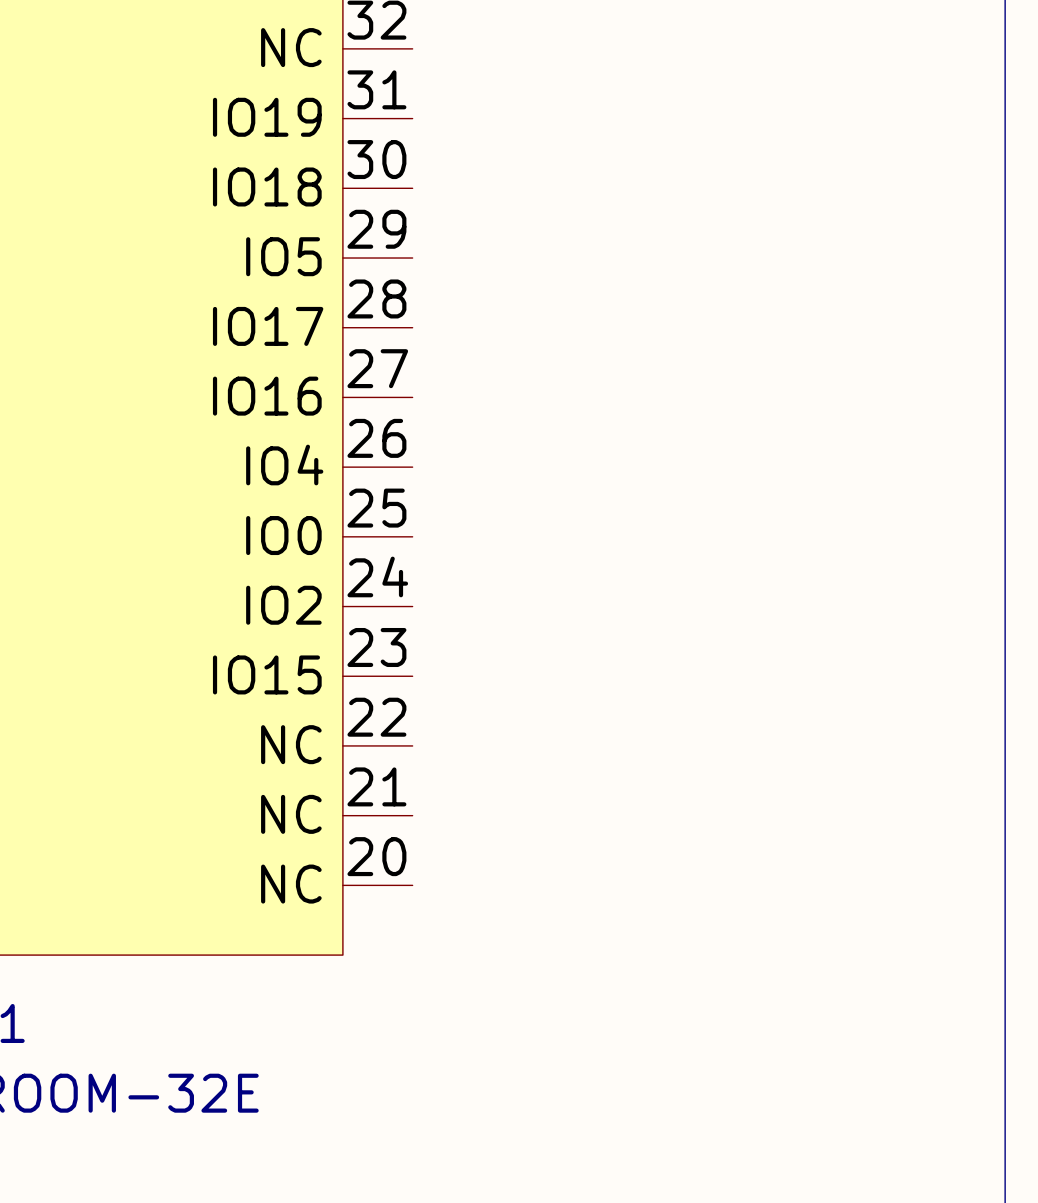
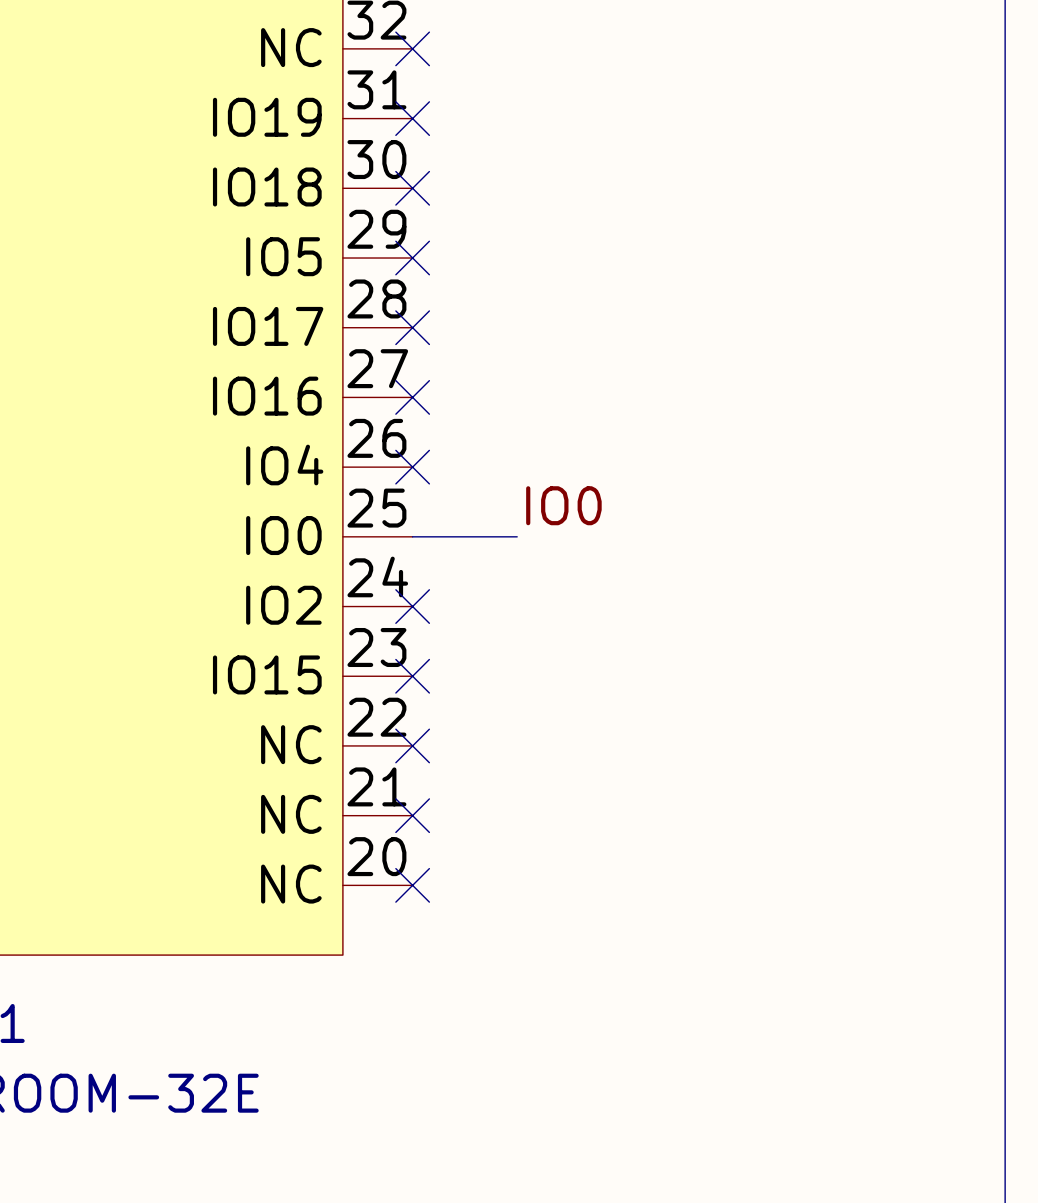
no-connect mark: none -> (412, 48)
no-connect mark: none -> (412, 118)
no-connect mark: none -> (412, 188)
no-connect mark: none -> (412, 258)
no-connect mark: none -> (412, 327)
no-connect mark: none -> (412, 397)
no-connect mark: none -> (412, 467)
label: none -> IO0 (563, 505)
wire: none -> (412, 536) (517, 536)
no-connect mark: none -> (412, 606)
no-connect mark: none -> (412, 676)
no-connect mark: none -> (412, 745)
no-connect mark: none -> (412, 815)
no-connect mark: none -> (412, 885)

